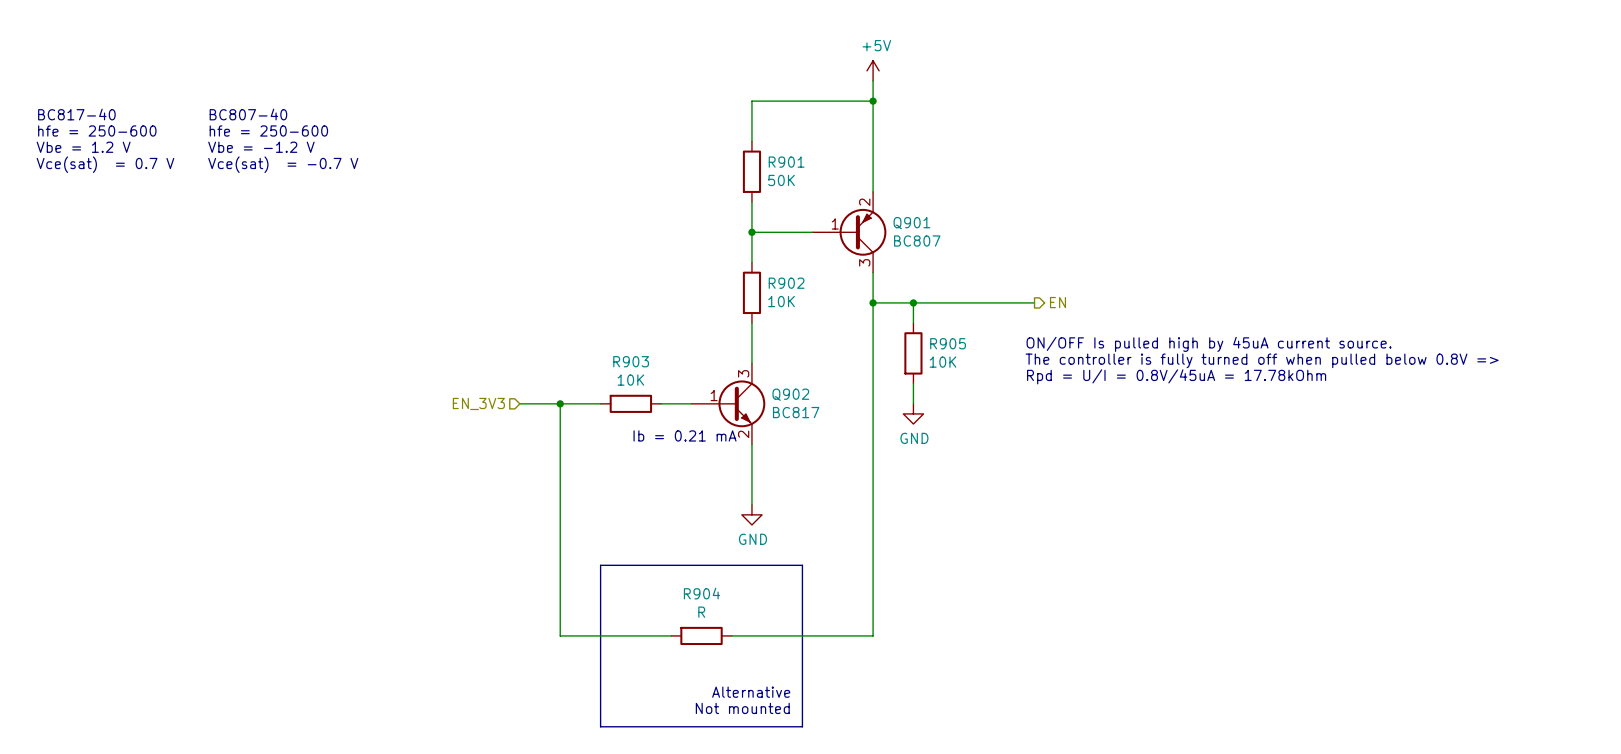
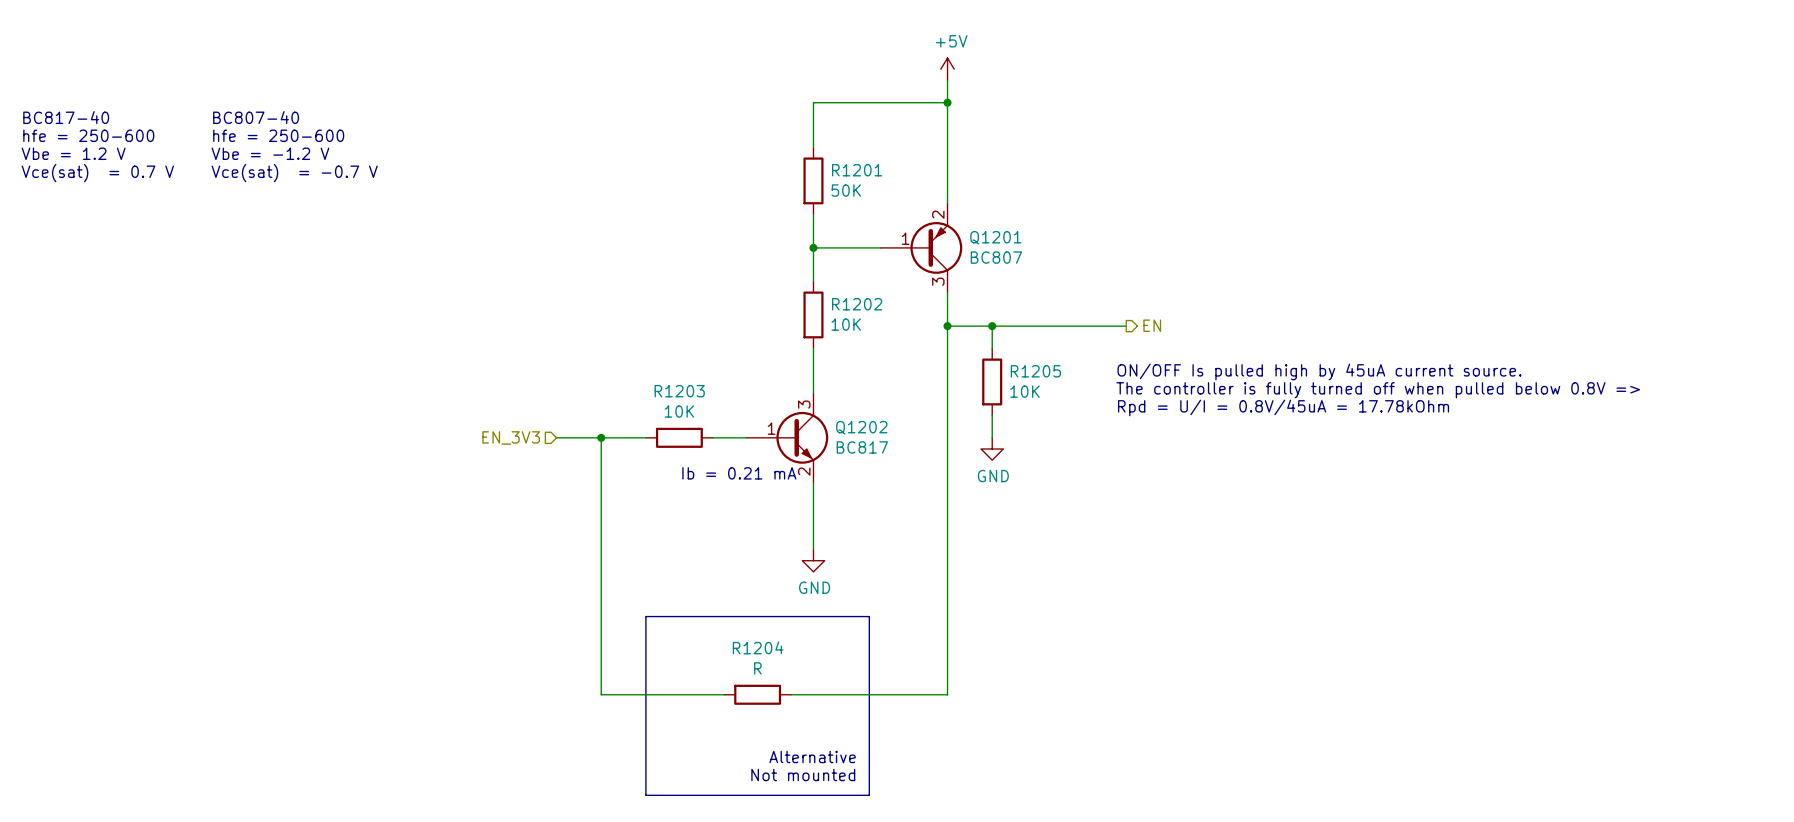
R901 name: R901 (786, 162) -> R1201 (857, 170)
Q901 name: Q901 (911, 223) -> Q1201 (995, 237)
R902 name: R902 (786, 283) -> R1202 (857, 304)
R905 name: R905 (948, 343) -> R1205 (1035, 371)
R903 name: R903 (631, 361) -> R1203 (679, 391)
Q902 name: Q902 (790, 394) -> Q1202 (861, 427)
R904 name: R904 (701, 593) -> R1204 (758, 647)

